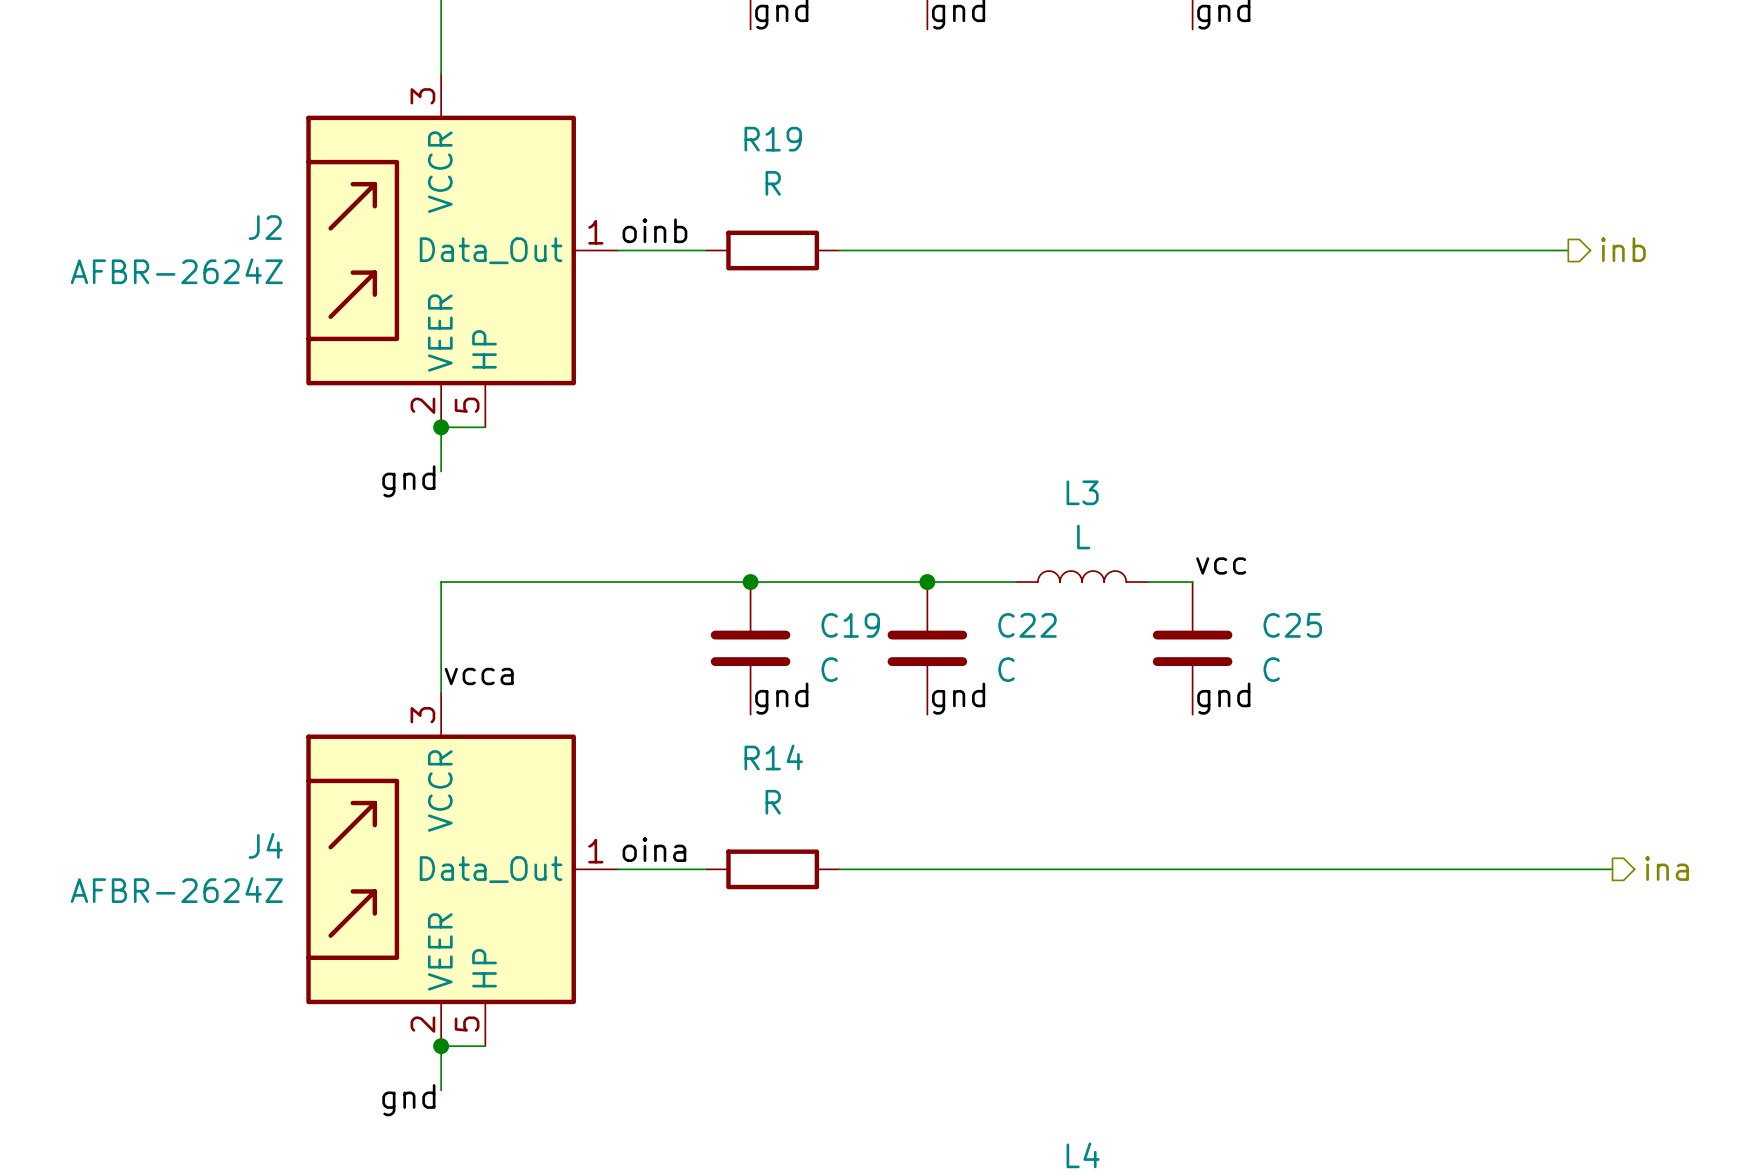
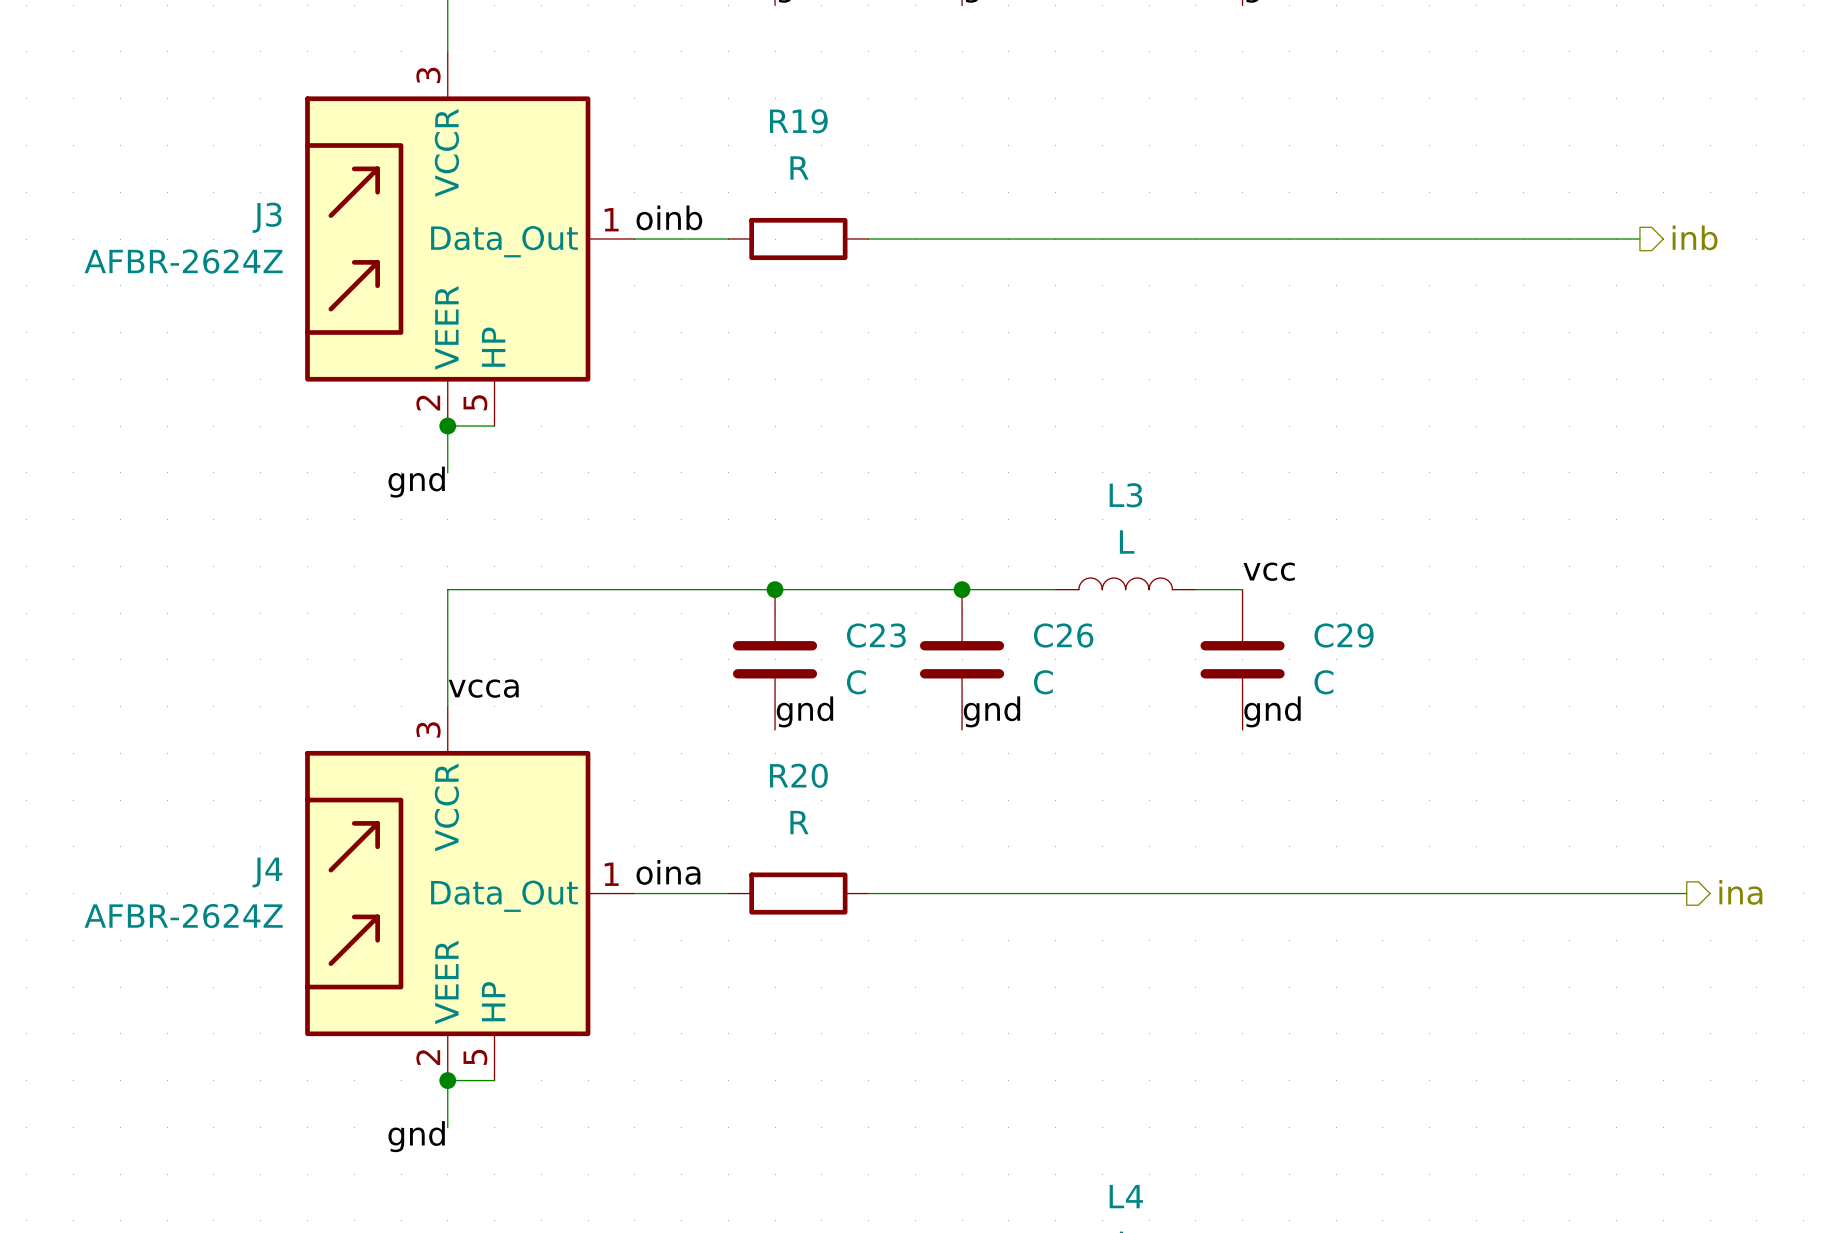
J2 name: J2 (265, 227) -> J3 (267, 217)
C19 name: C19 (850, 625) -> C23 (876, 635)
C22 name: C22 (1027, 625) -> C26 (1063, 635)
C25 name: C25 (1292, 625) -> C29 (1344, 635)
R14 name: R14 (773, 757) -> R20 (798, 775)

